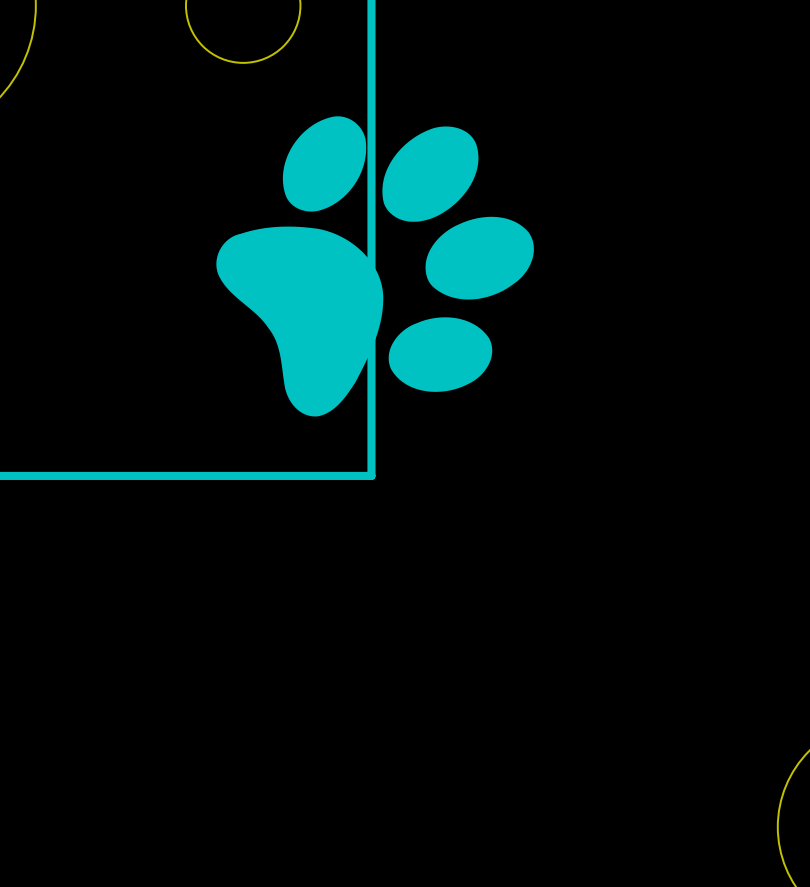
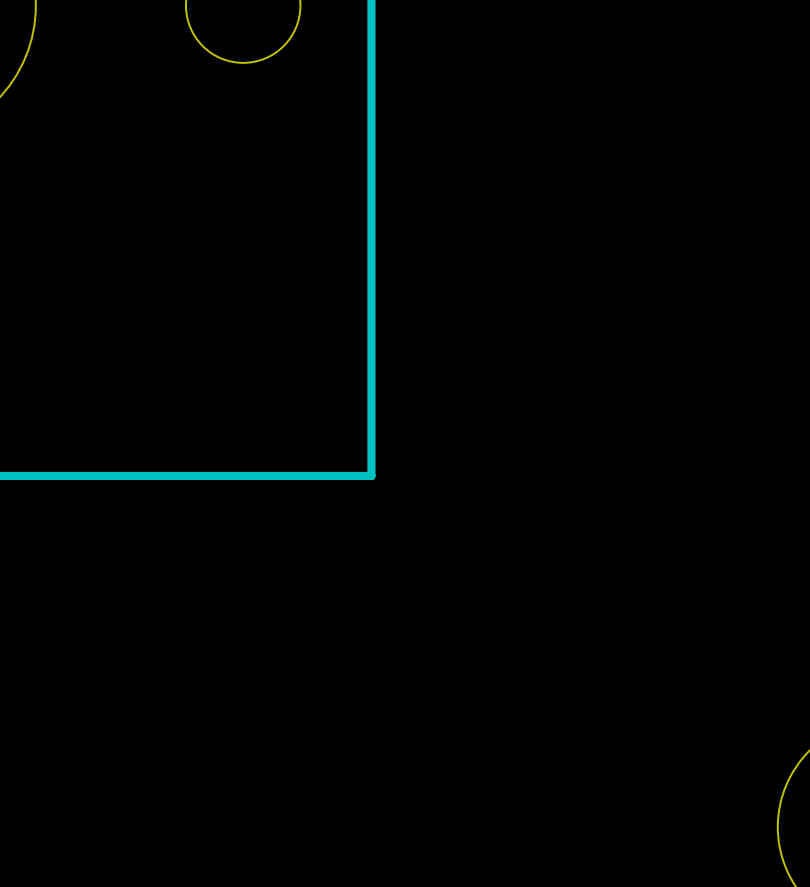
drawing: [216, 116, 534, 417] -> none

